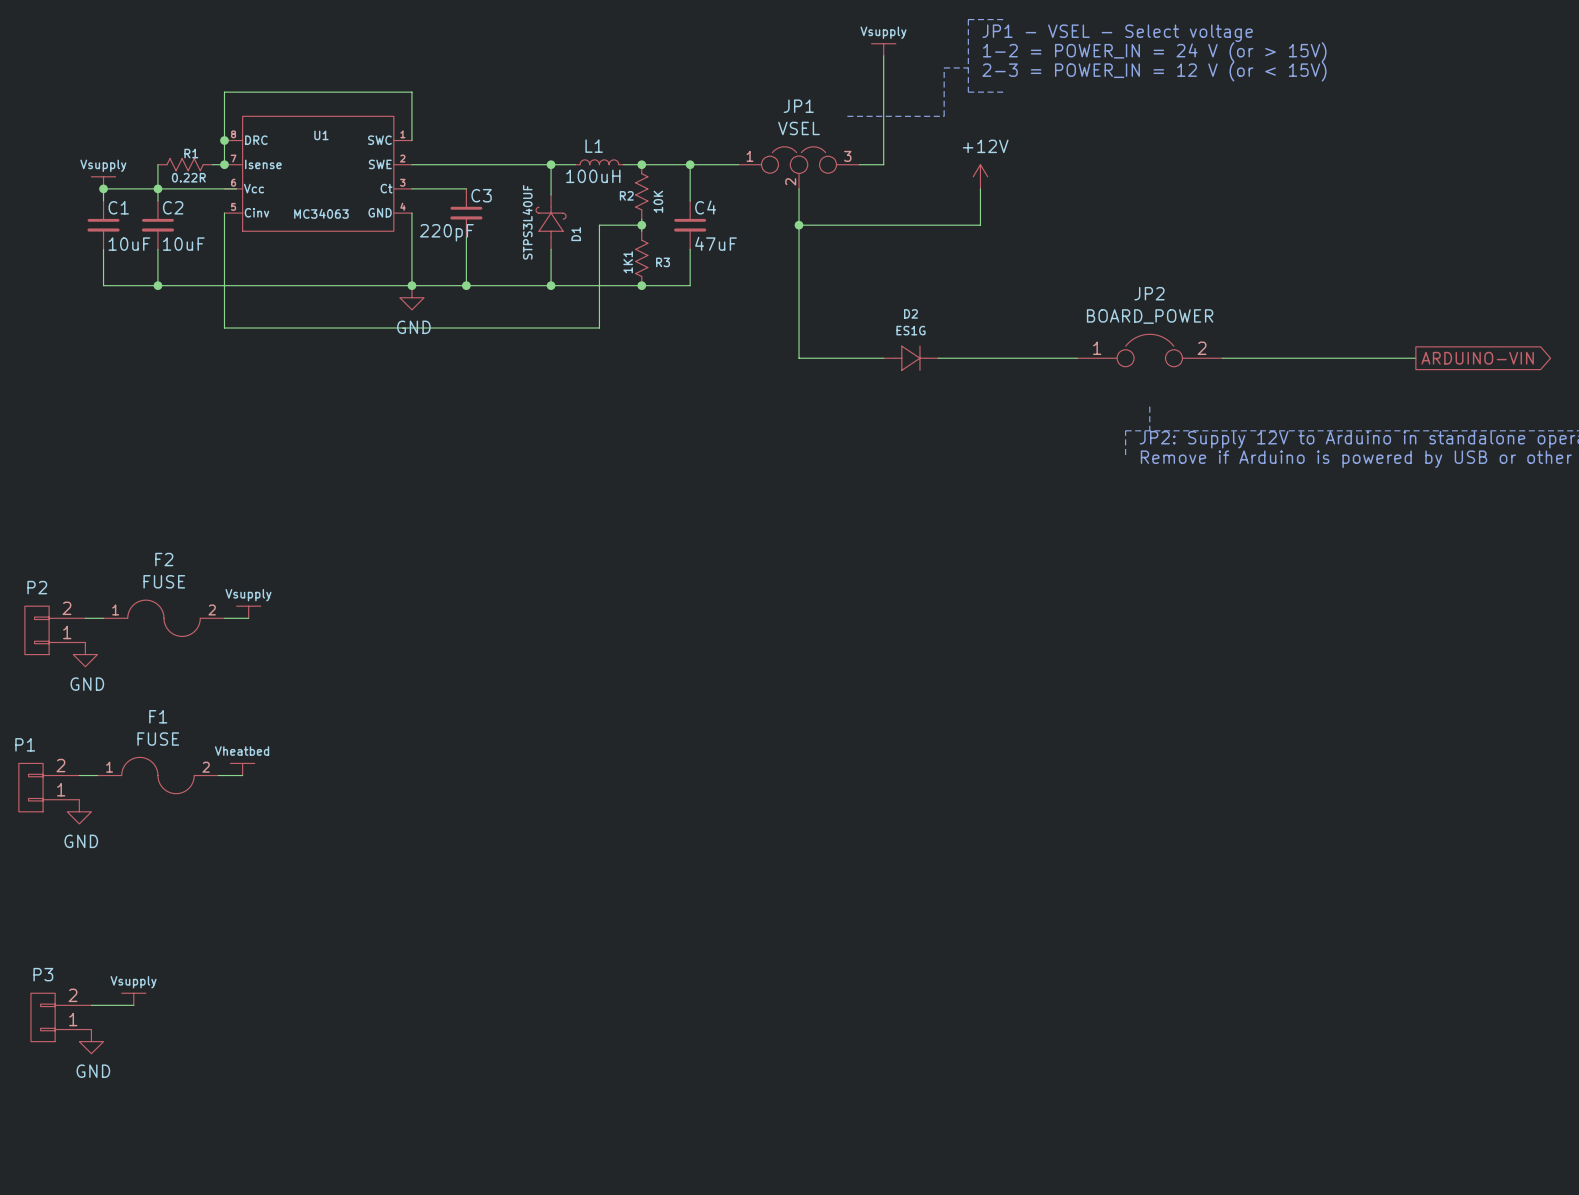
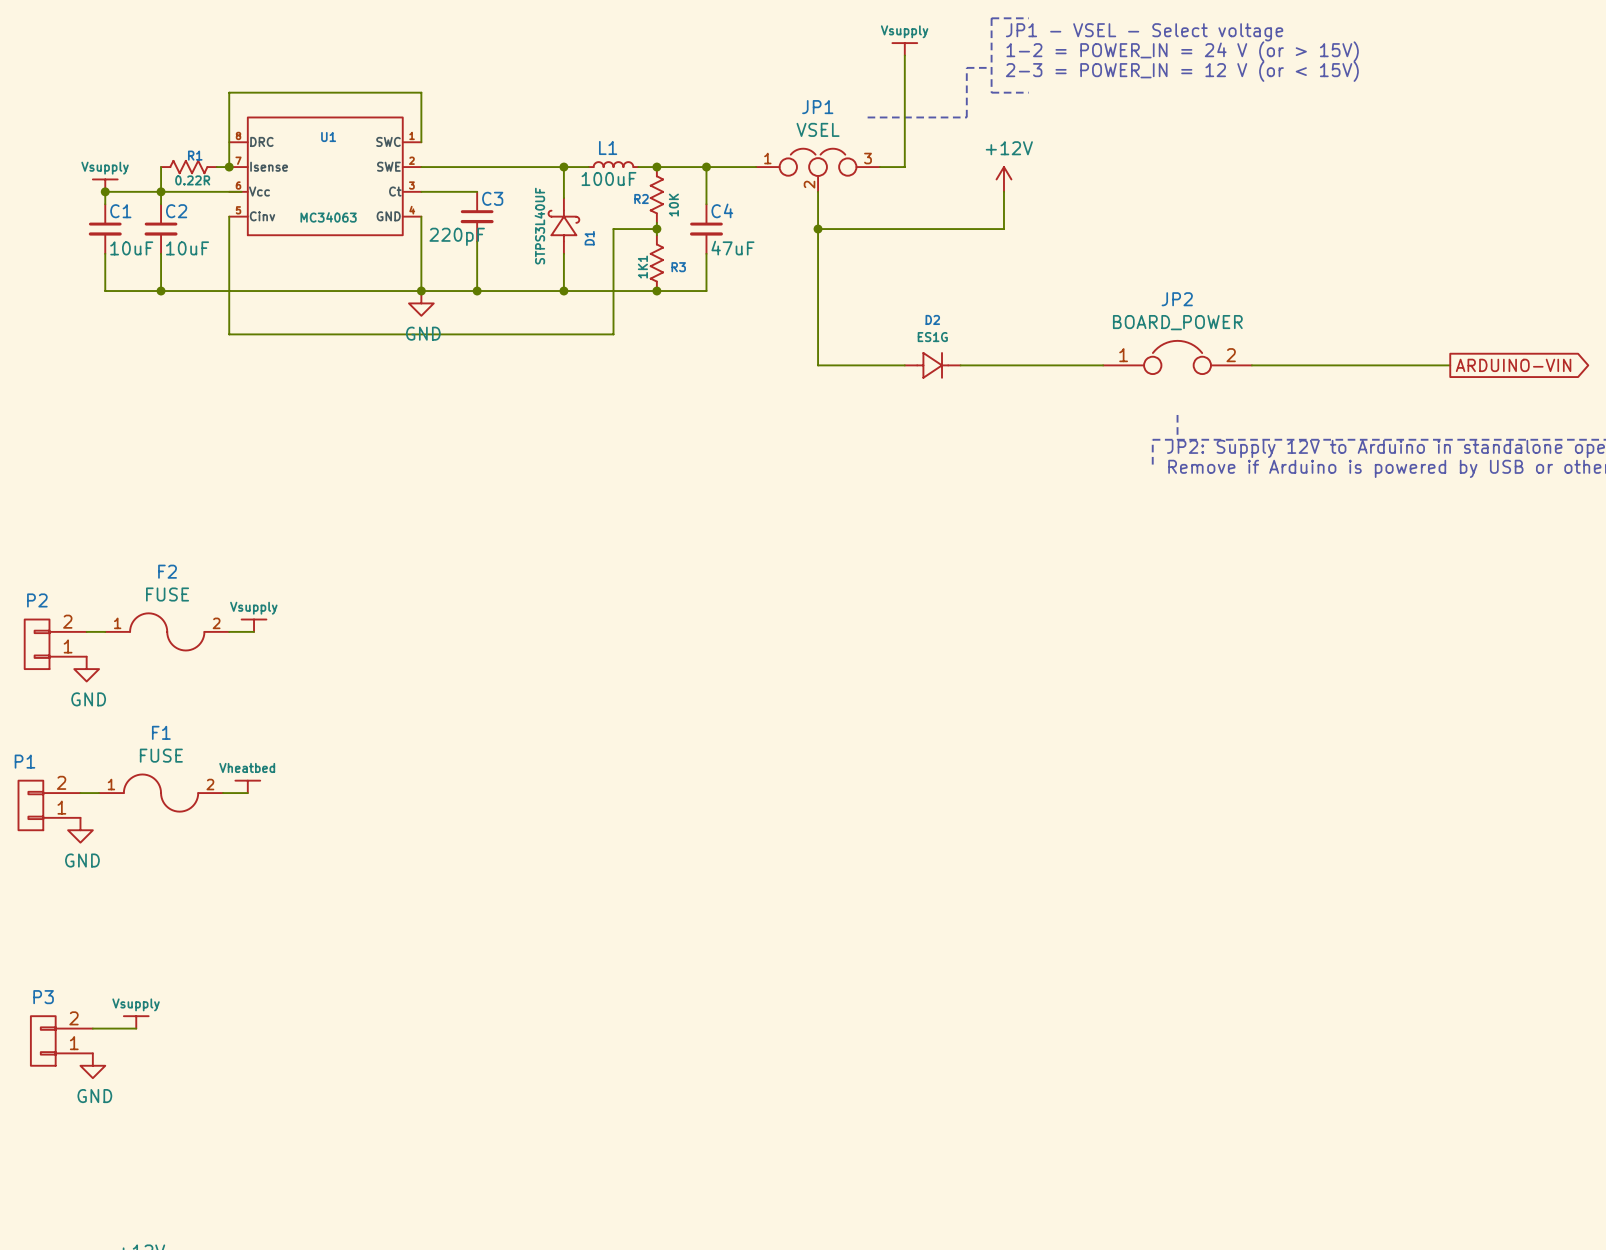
junction: (224, 140) -> none
L1 value: 100uH (593, 176) -> 100uF (608, 178)

